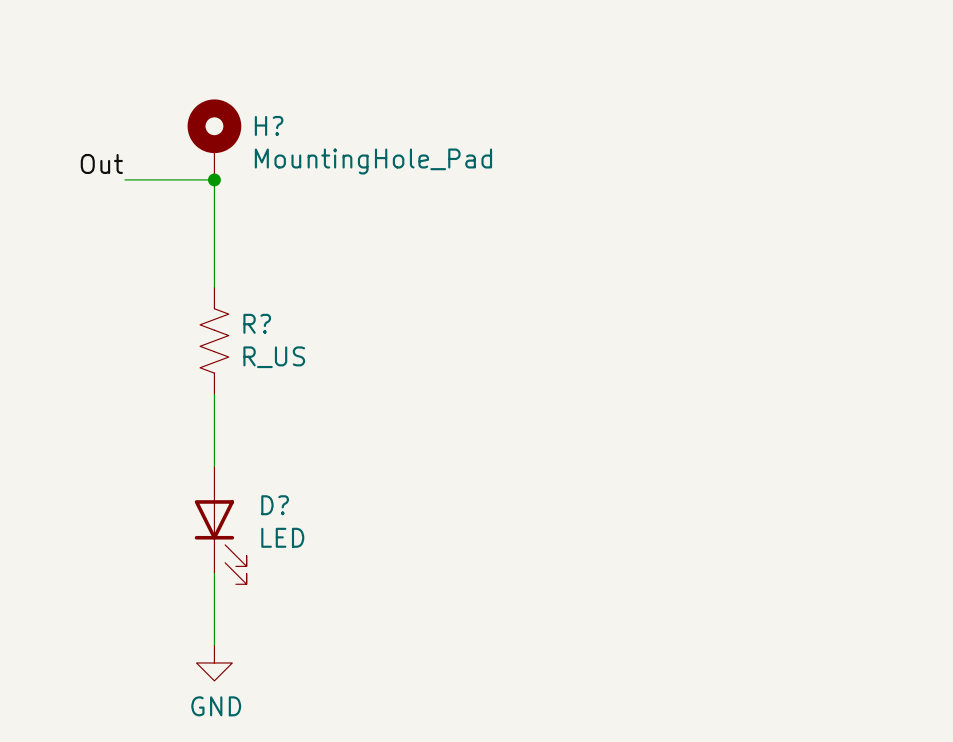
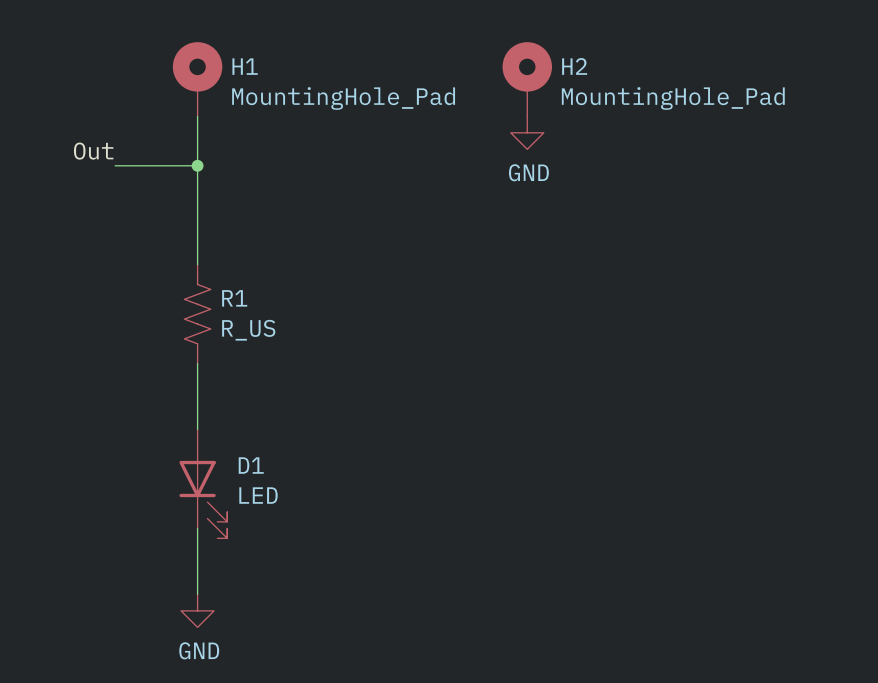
H1: none -> MountingHole_Pad (197, 79)
H2: none -> MountingHole_Pad (527, 79)
H?: MountingHole_Pad (214, 139) -> none
power symbol: none -> GND (527, 132)
R? name: R? (257, 323) -> R1 (234, 298)
D? name: D? (275, 505) -> D1 (251, 465)

